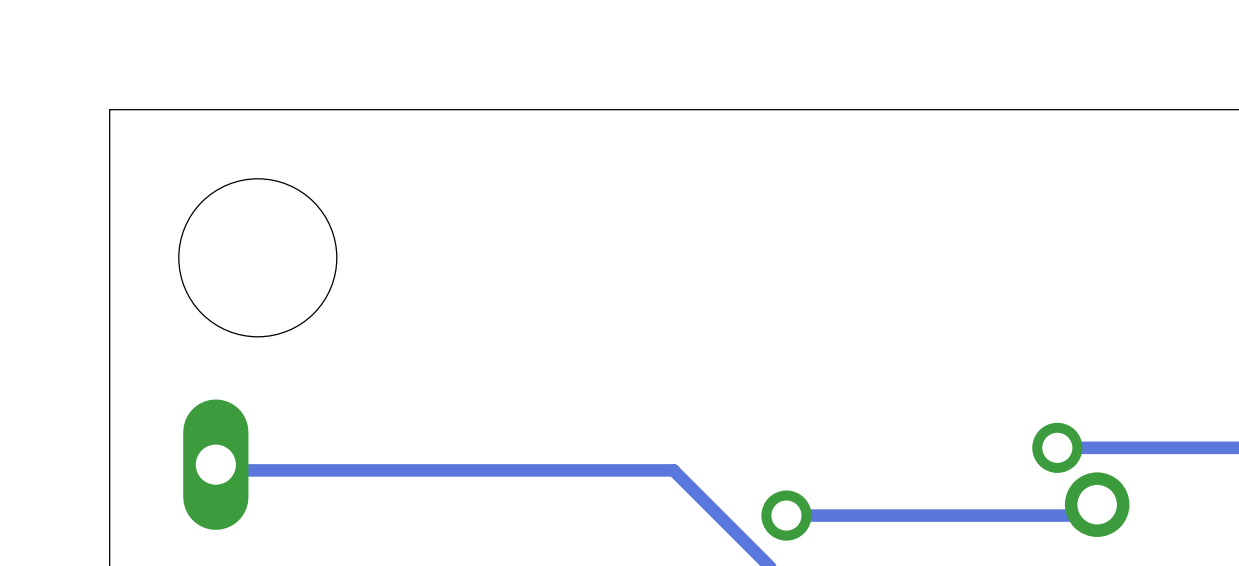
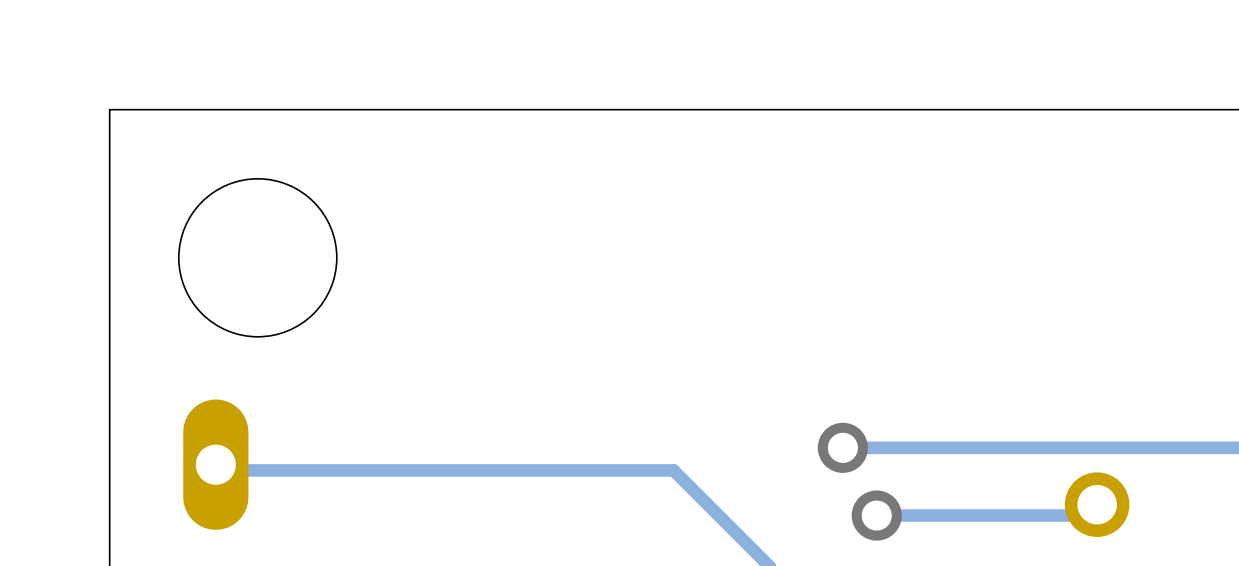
via: none -> (842, 447)
track: none -> (1057, 447) (842, 447)
via: (1057, 447) -> none
via: (786, 515) -> none
track: (876, 515) (786, 515) -> none
via: none -> (876, 515)

